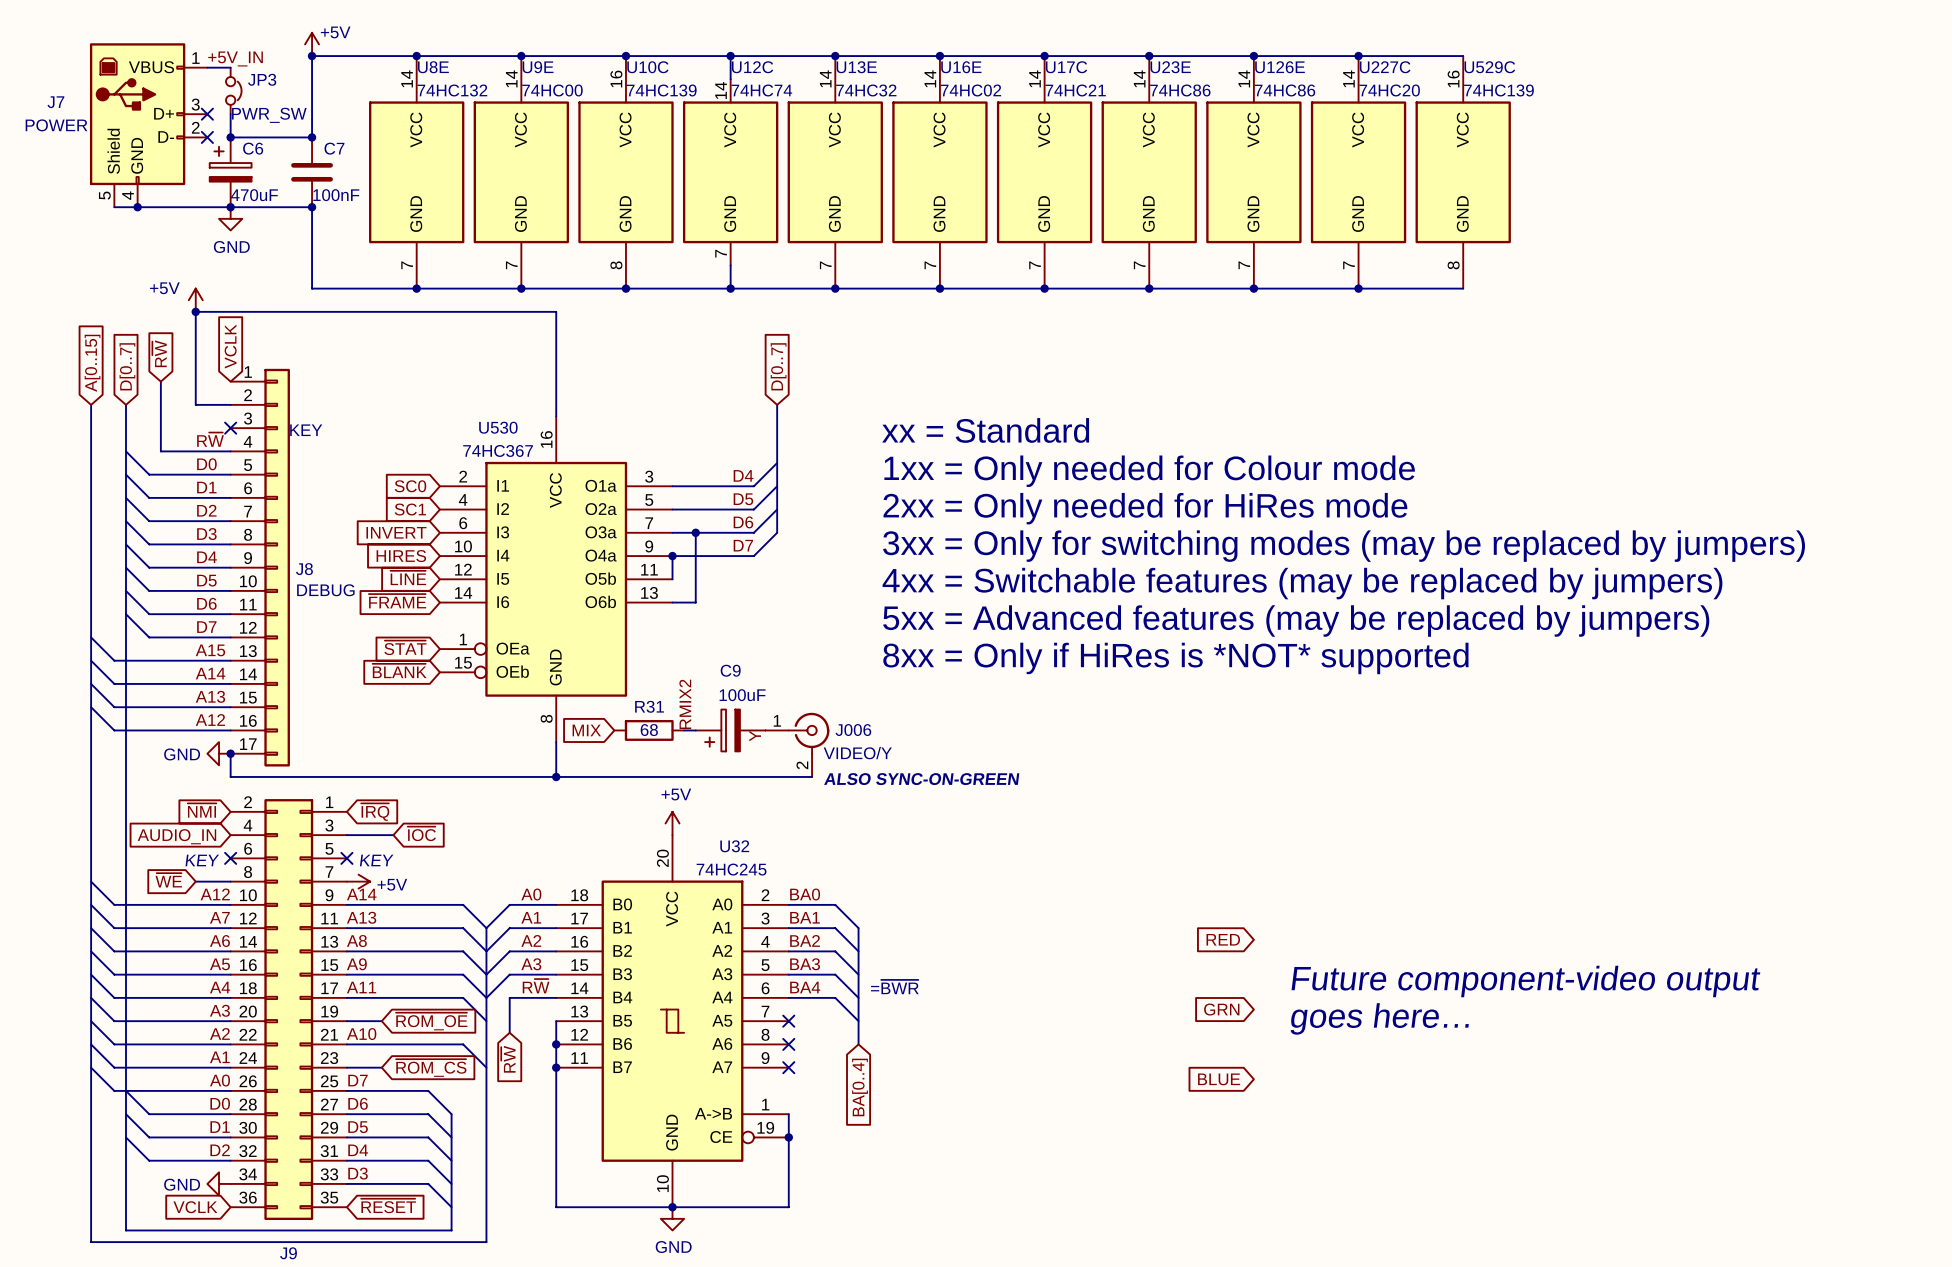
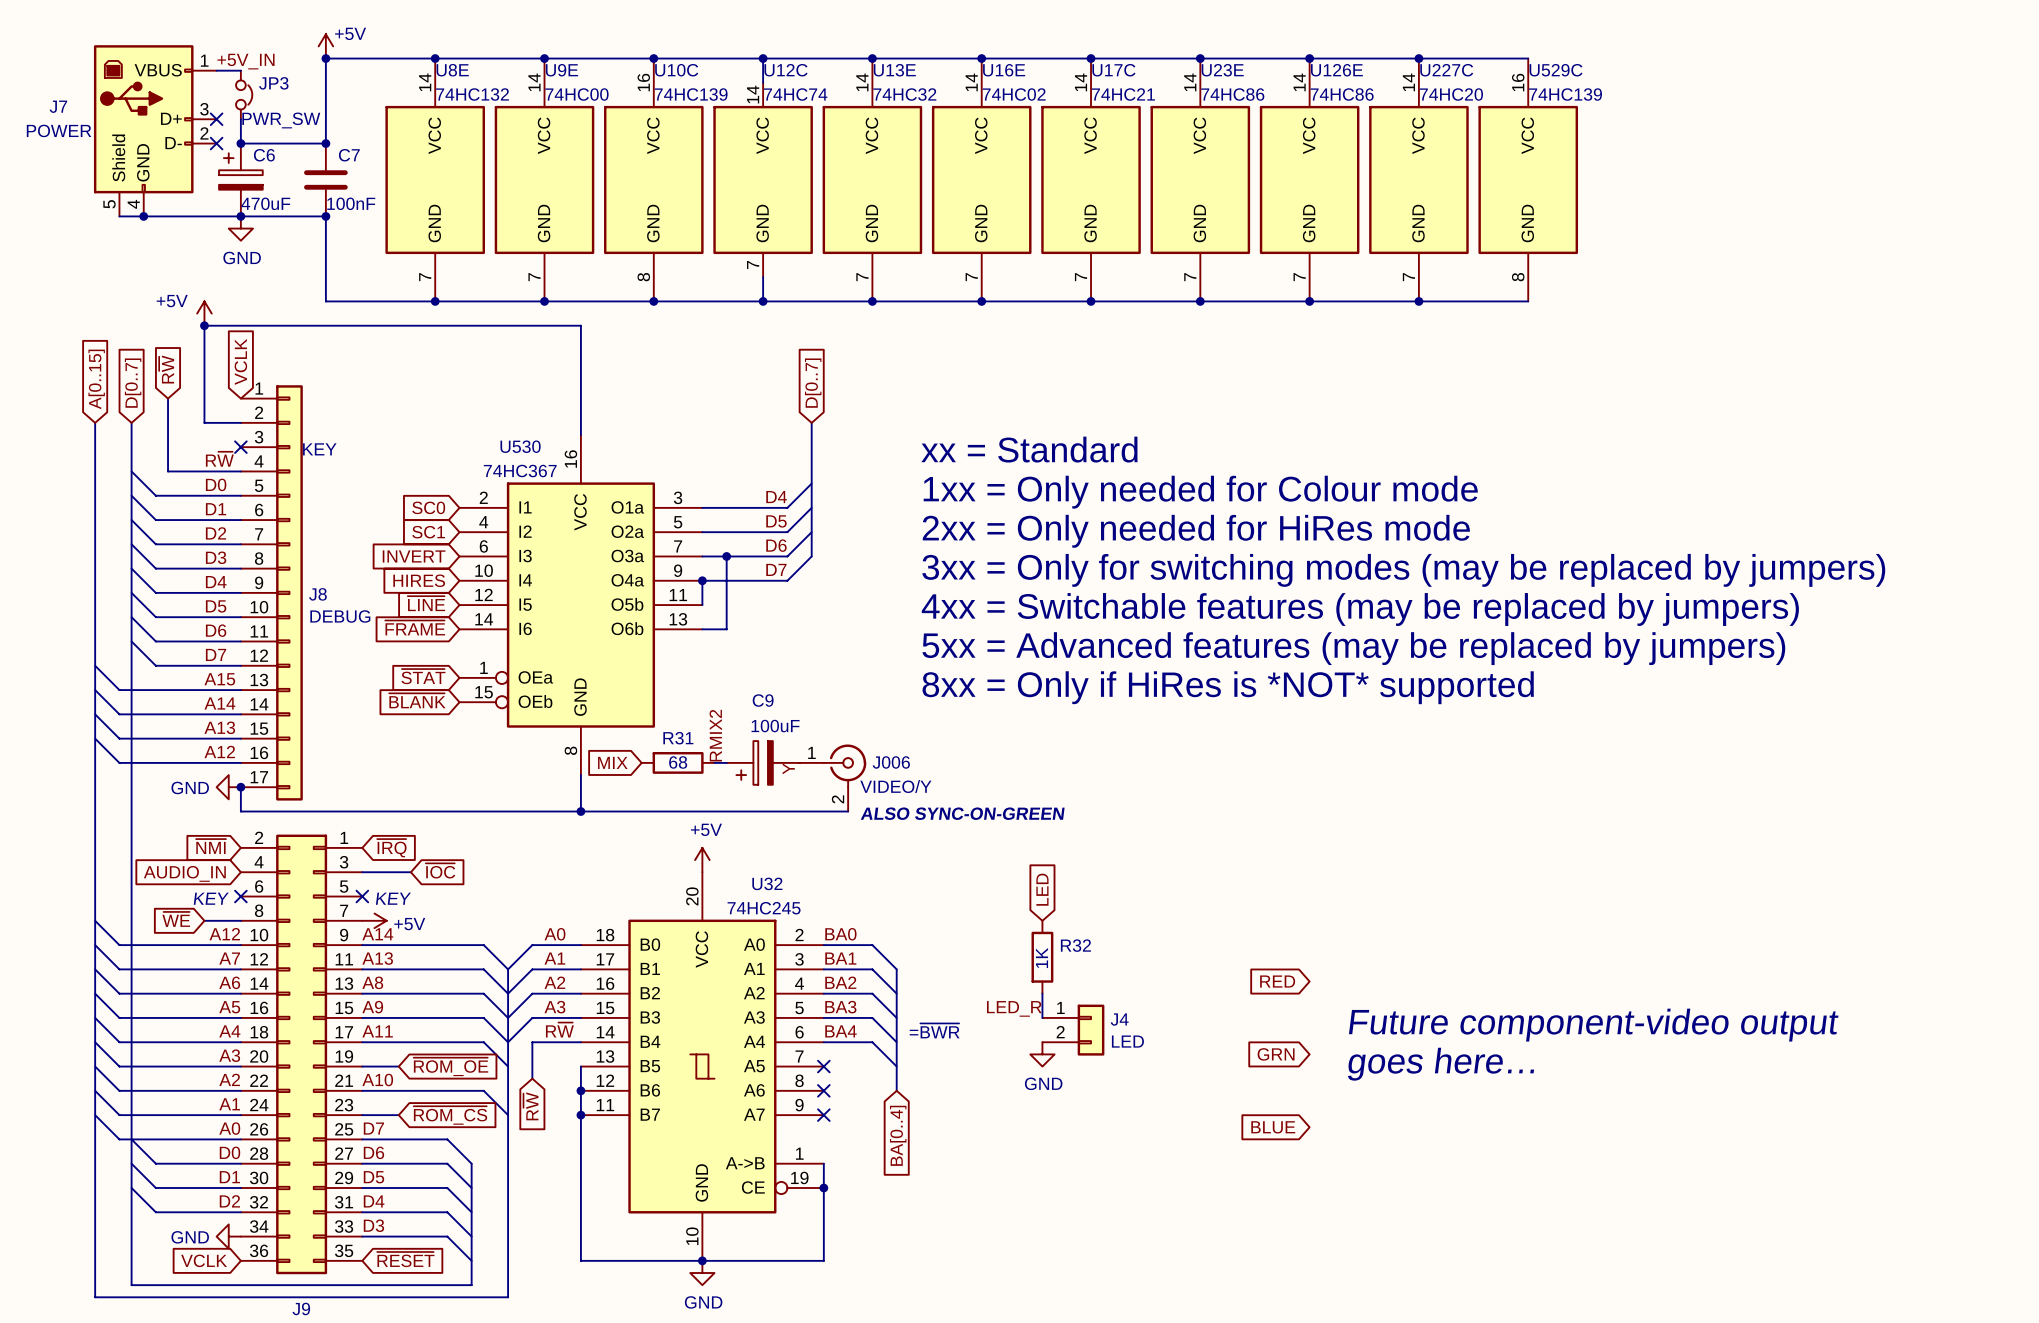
global label: none -> LED (1042, 889)
R32: none -> 1K (1042, 957)
wire: none -> (1042, 993) (1042, 1017)
label: none -> LED_R (1014, 1008)
J4: none -> LED (1073, 1030)
power symbol: none -> GND (1042, 1054)

